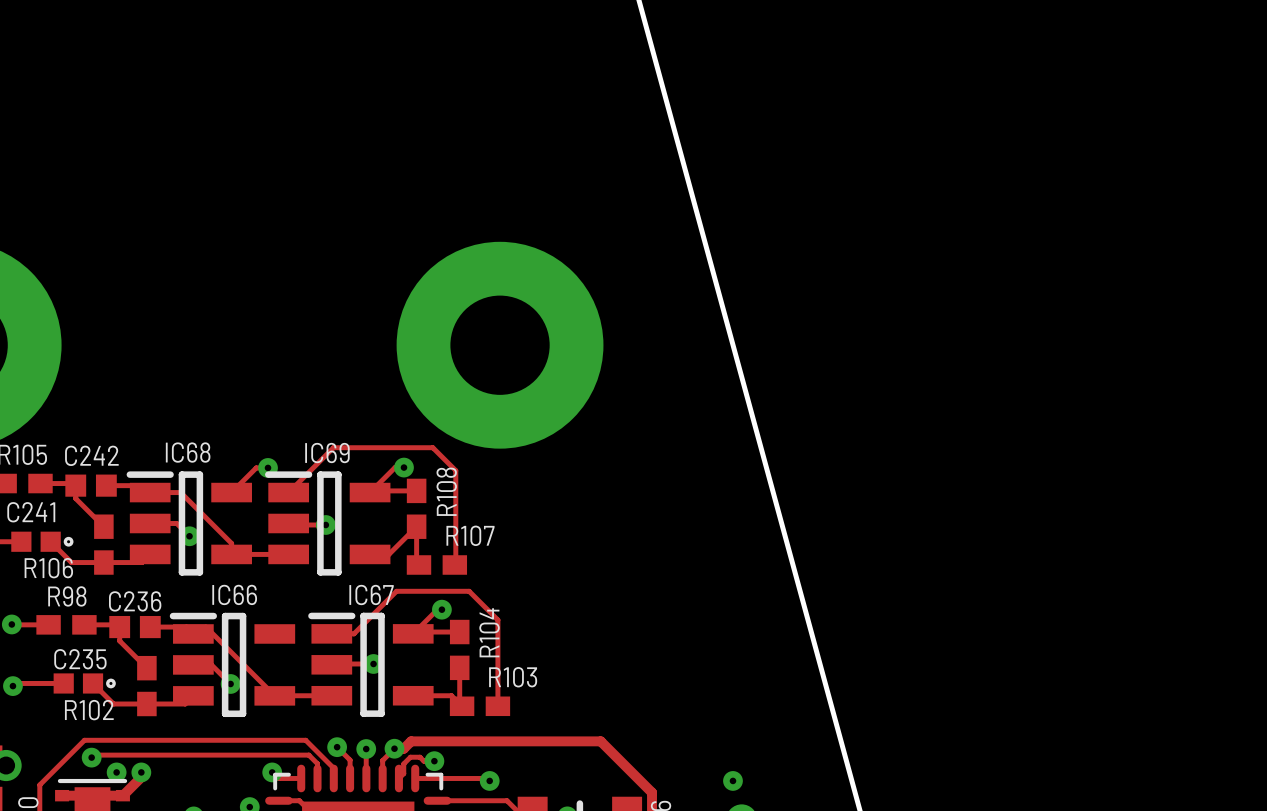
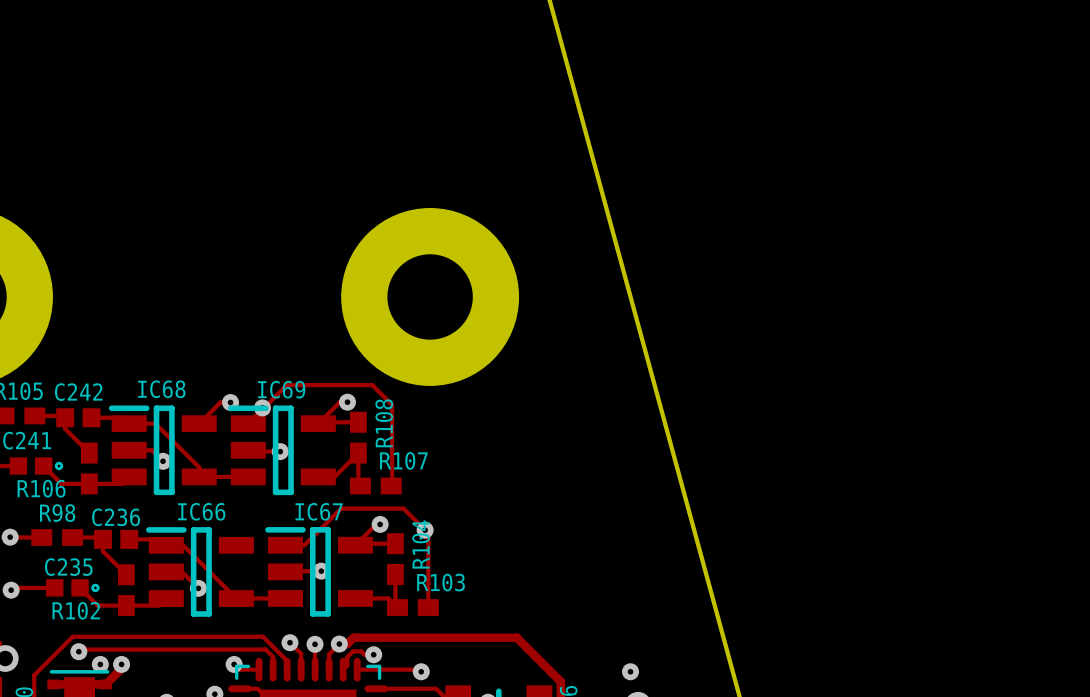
via: none -> (262, 407)
via: none -> (425, 530)

